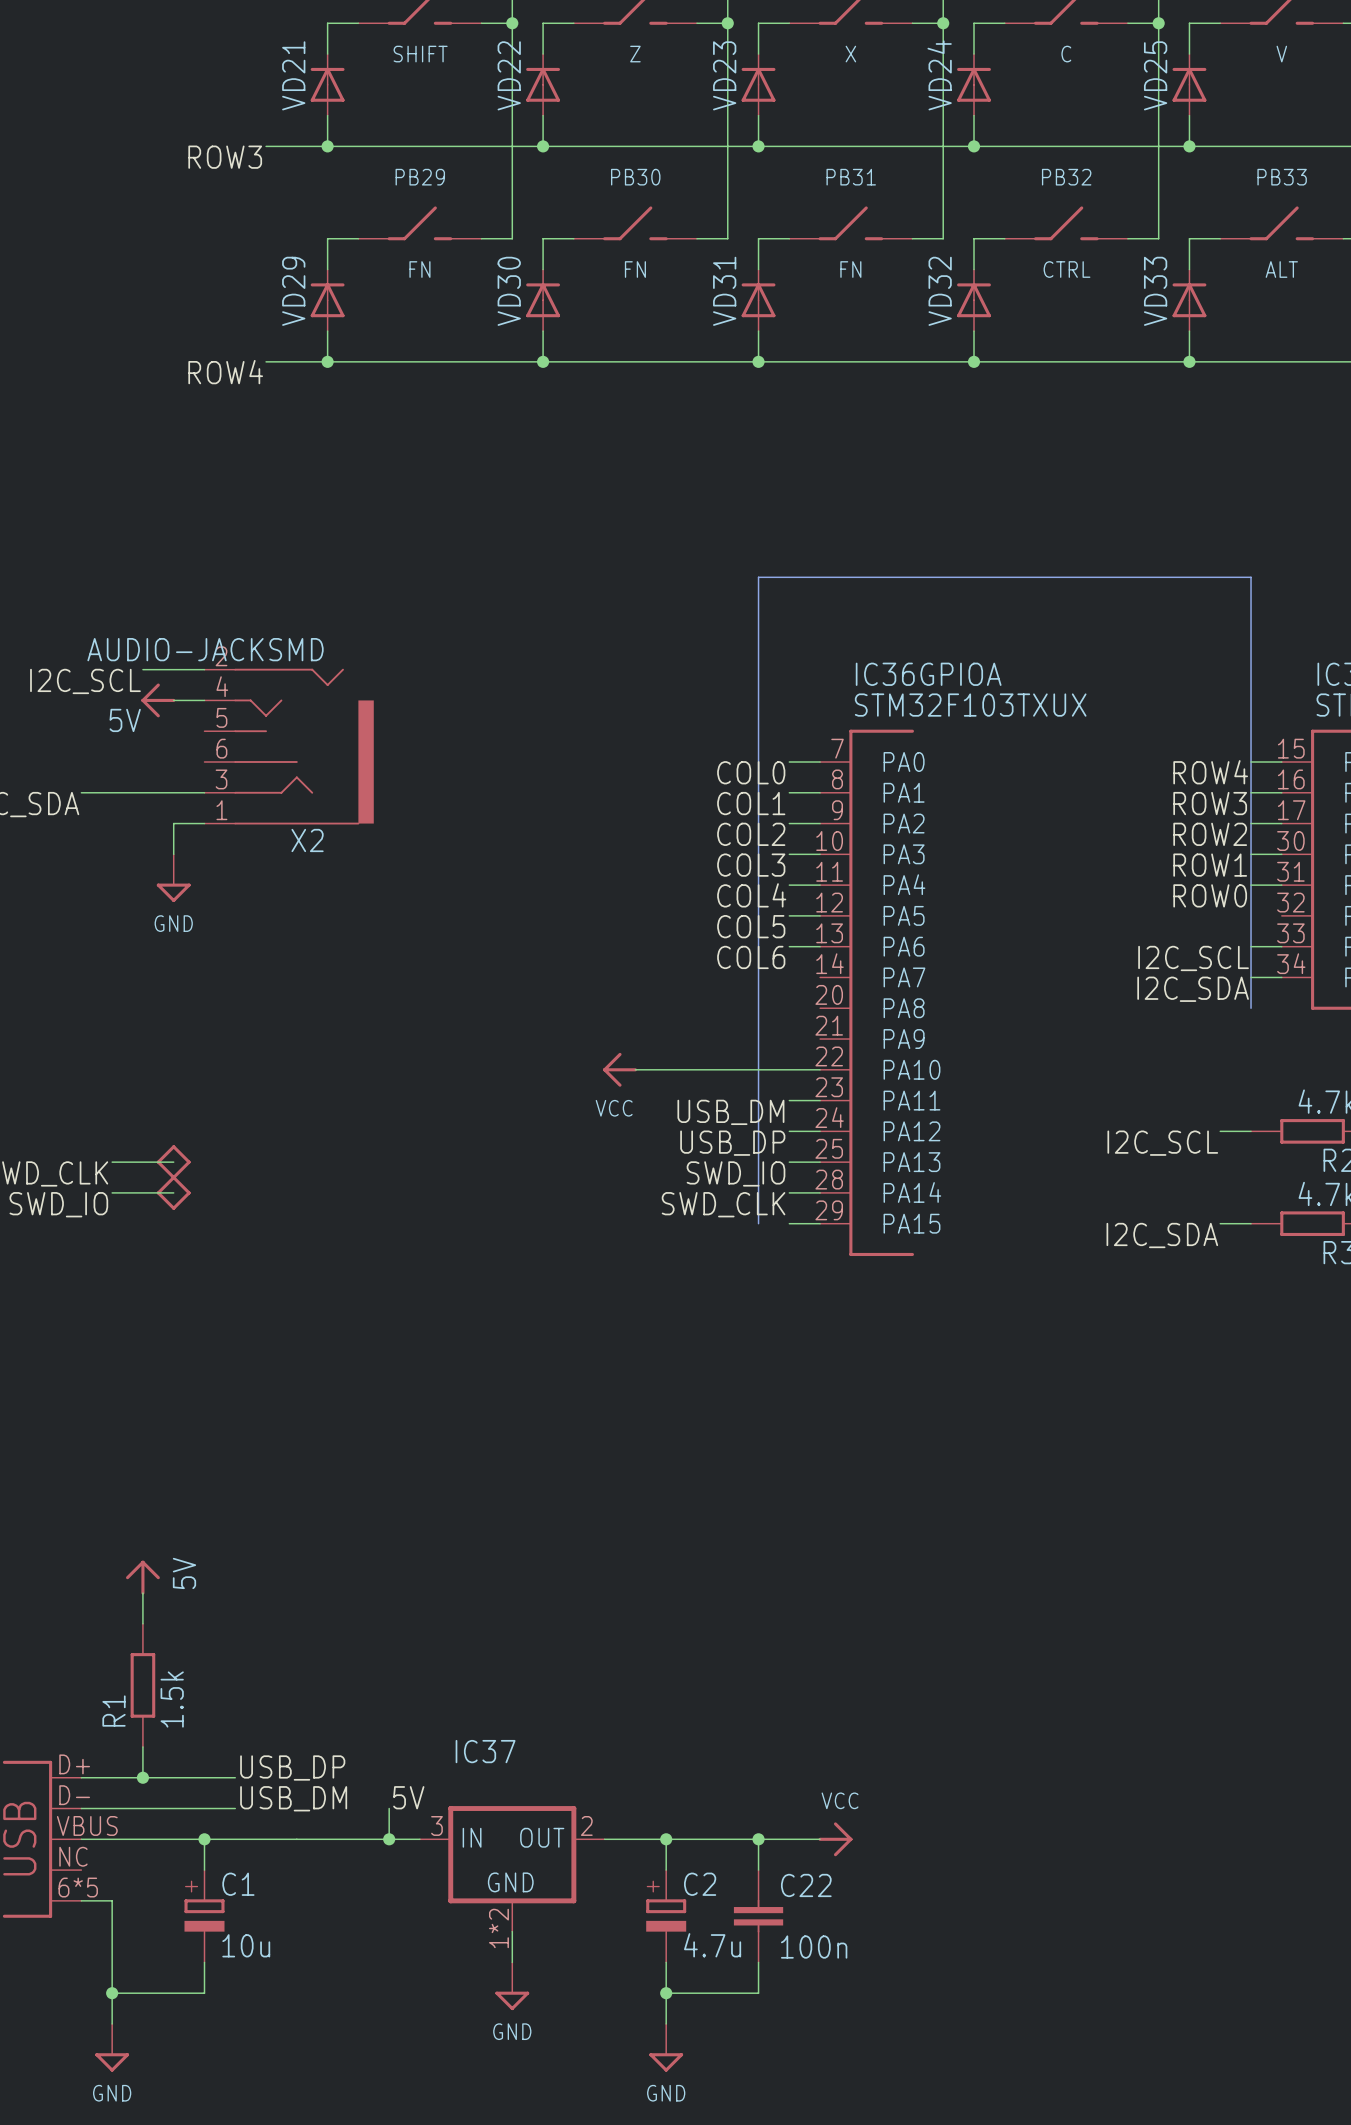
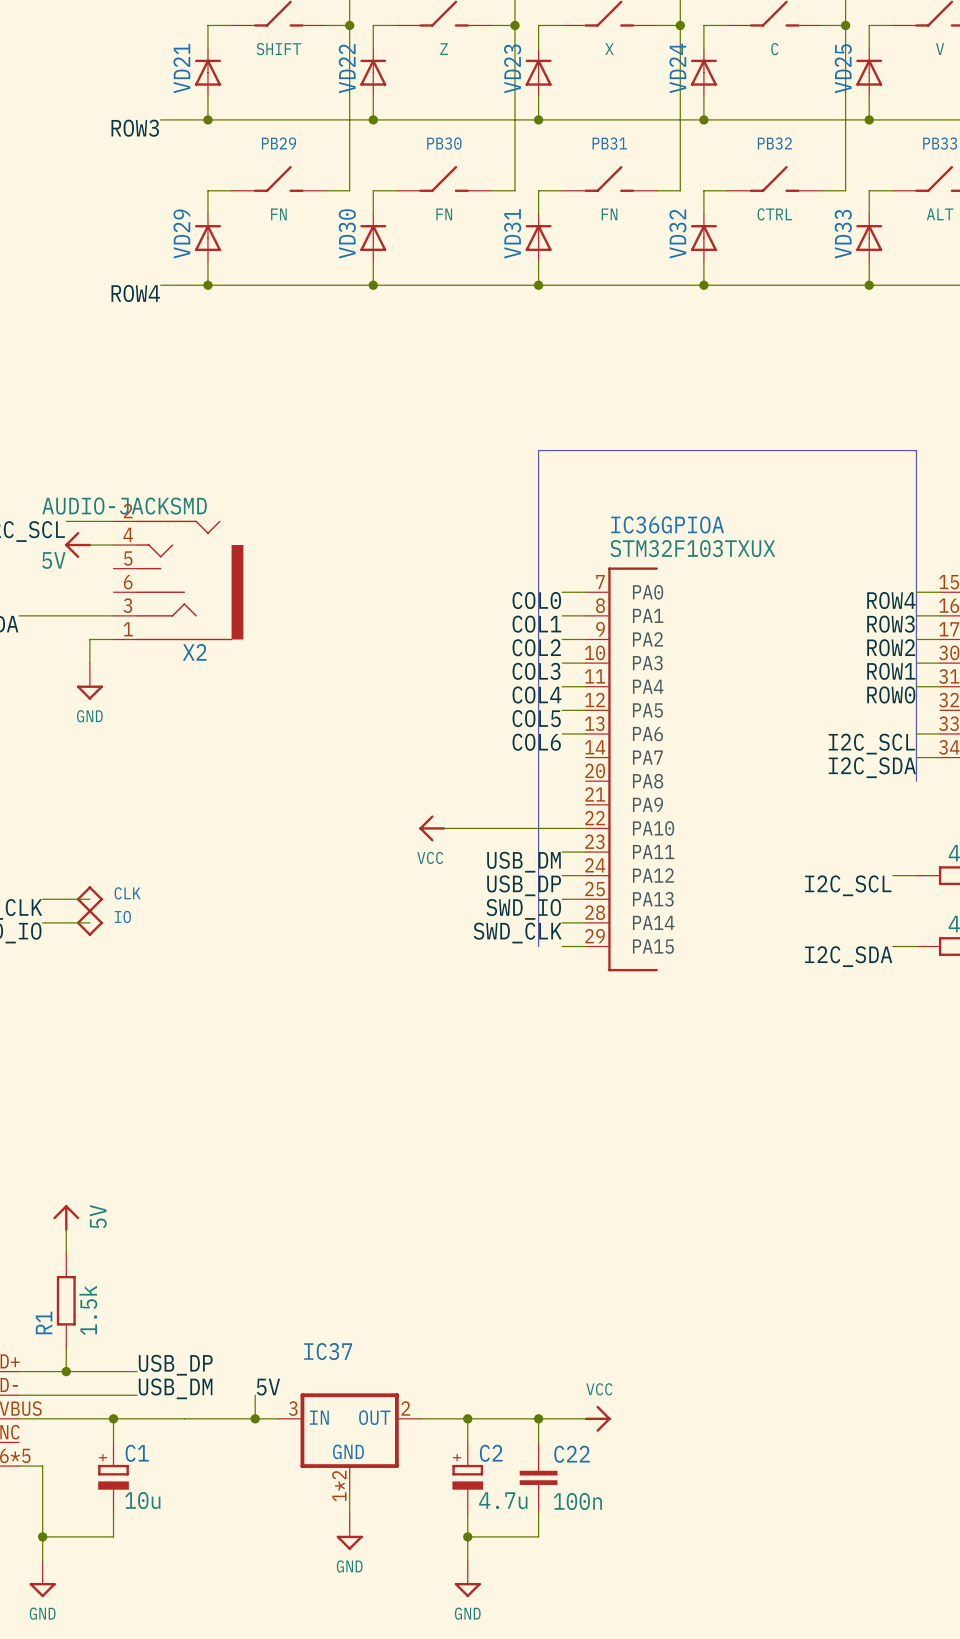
part value: none -> CLK (127, 893)
part value: none -> IO (122, 916)

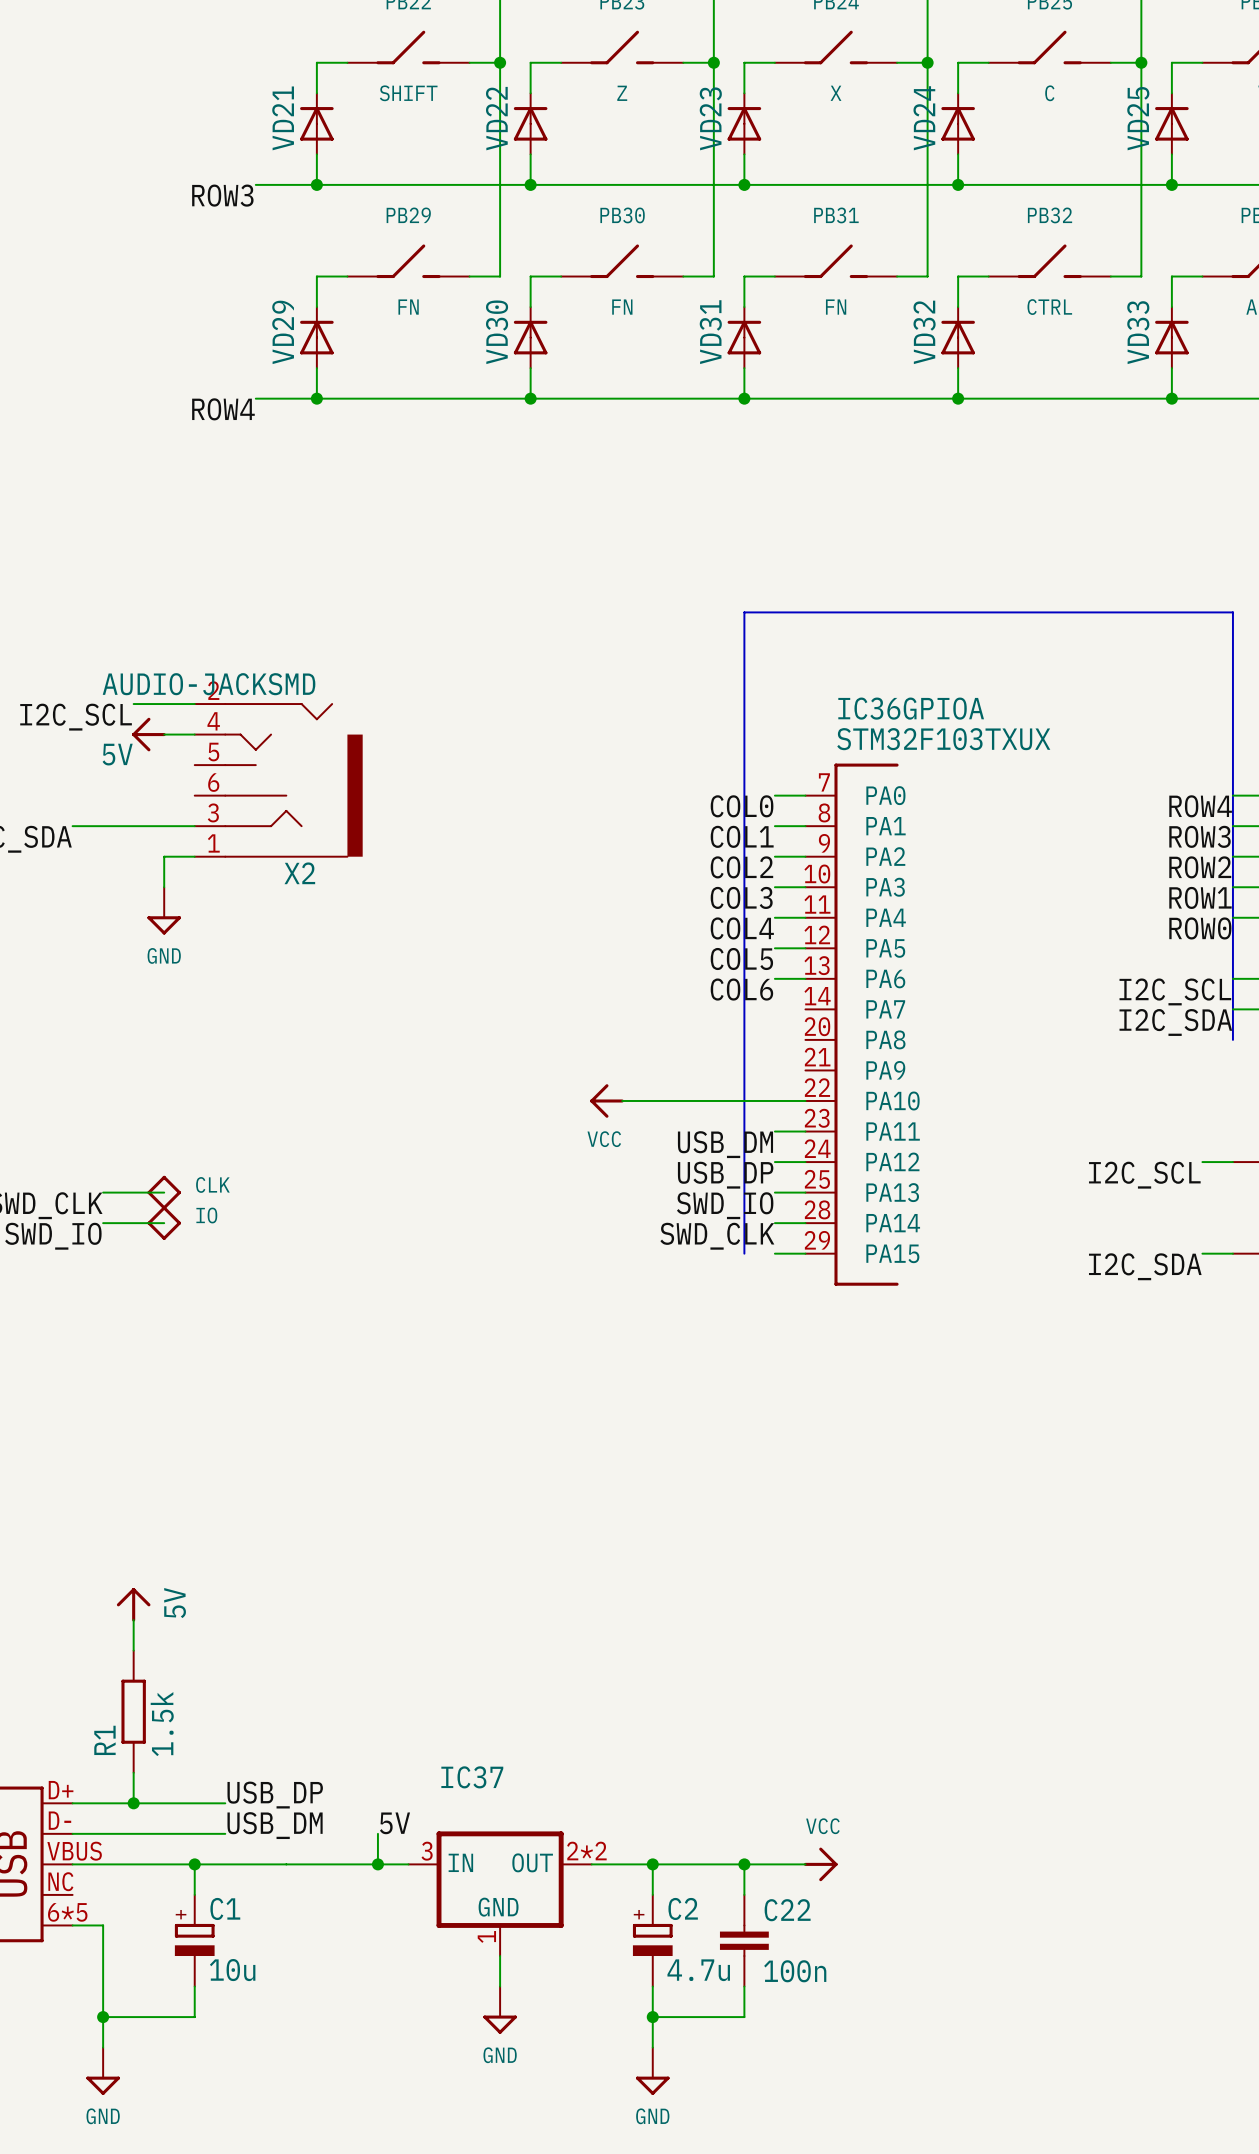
IC37 pin number: 2 (405, 1408) -> 2*2 (586, 1851)
IC37 pin number: 1*2 (339, 1486) -> 1 (486, 1936)

